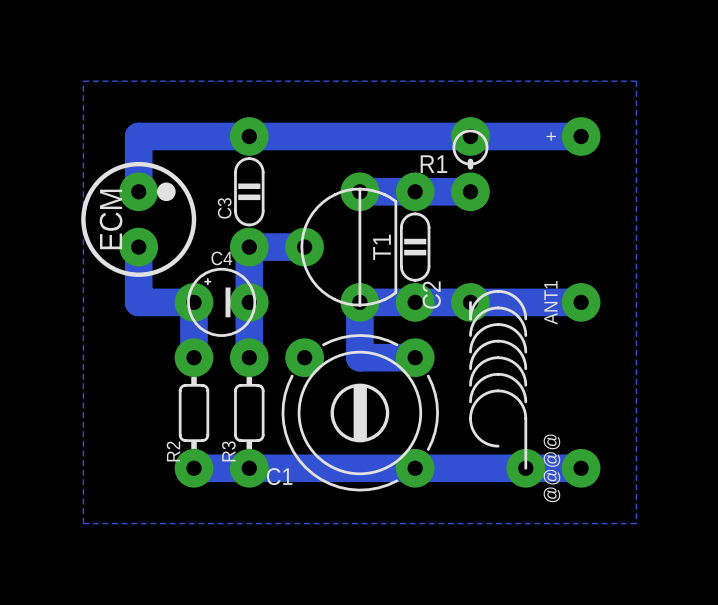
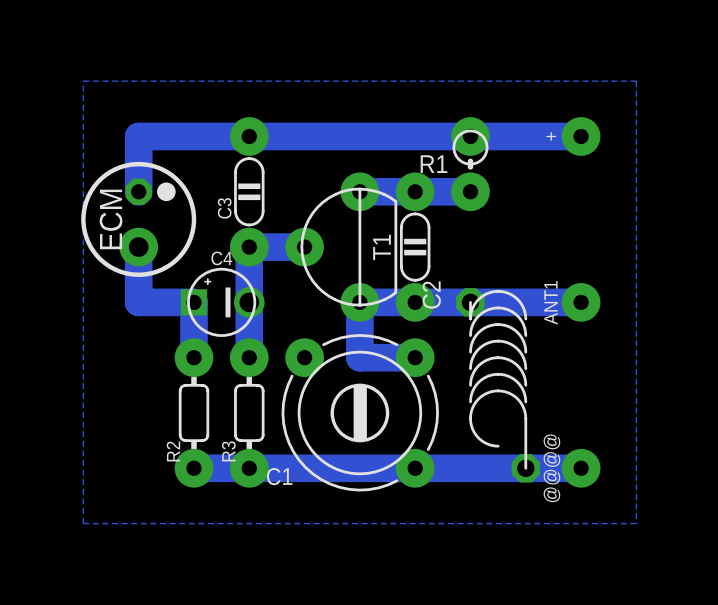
ECM footprint: [81, 161, 197, 277] -> [81, 161, 197, 277]
C4 footprint: [174, 267, 269, 337] -> [180, 267, 265, 337]
part footprint: [451, 283, 546, 488] -> [456, 288, 541, 483]

